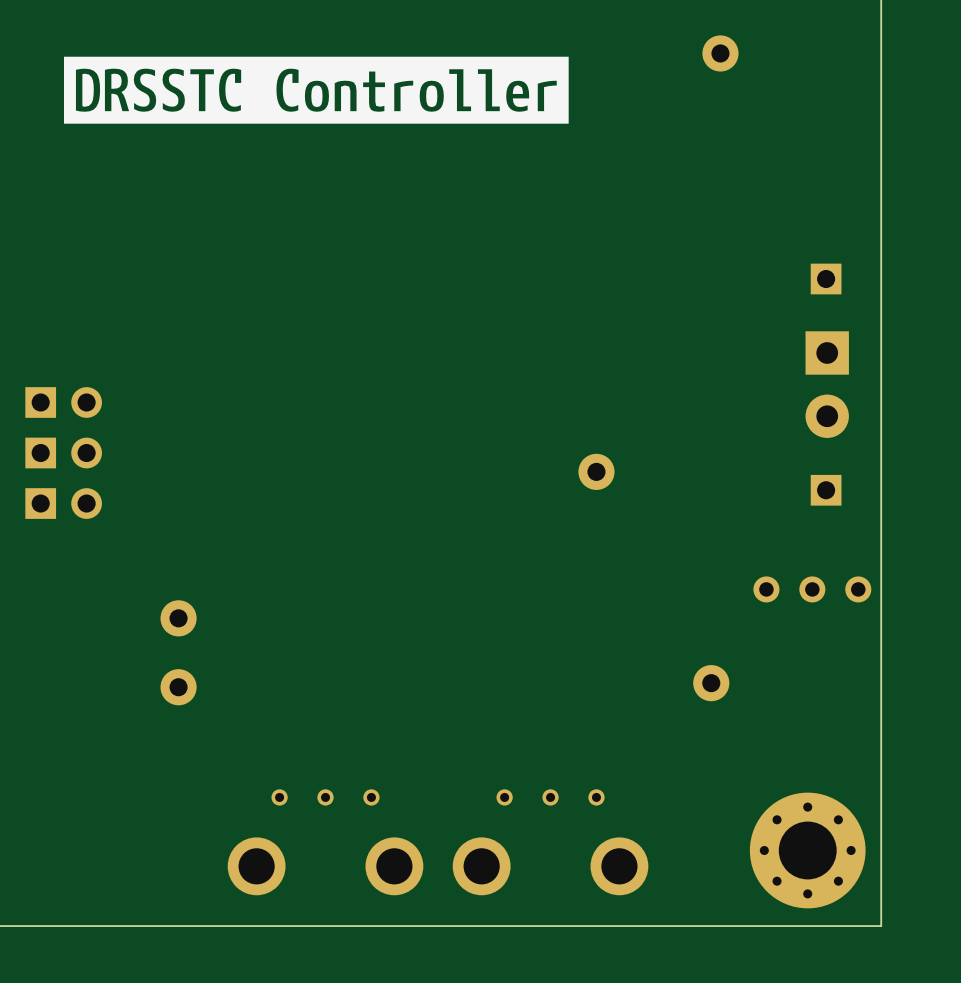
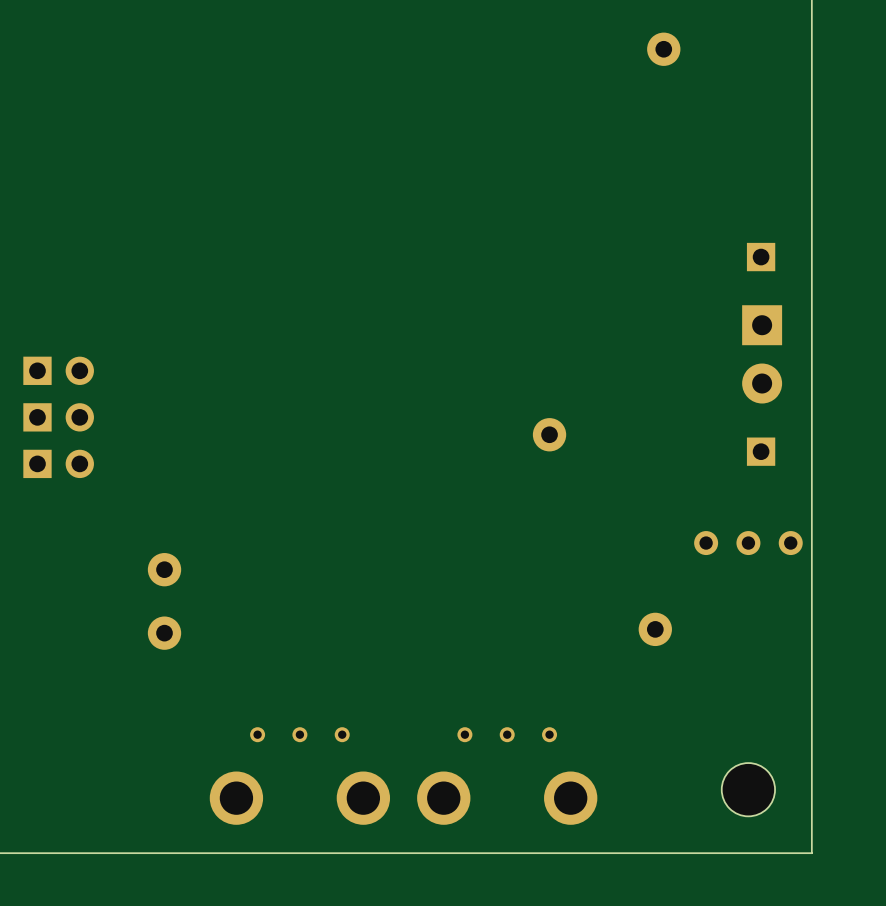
drawing: [63, 56, 569, 124] -> none
part footprint: [749, 792, 866, 909] -> [721, 763, 776, 817]

